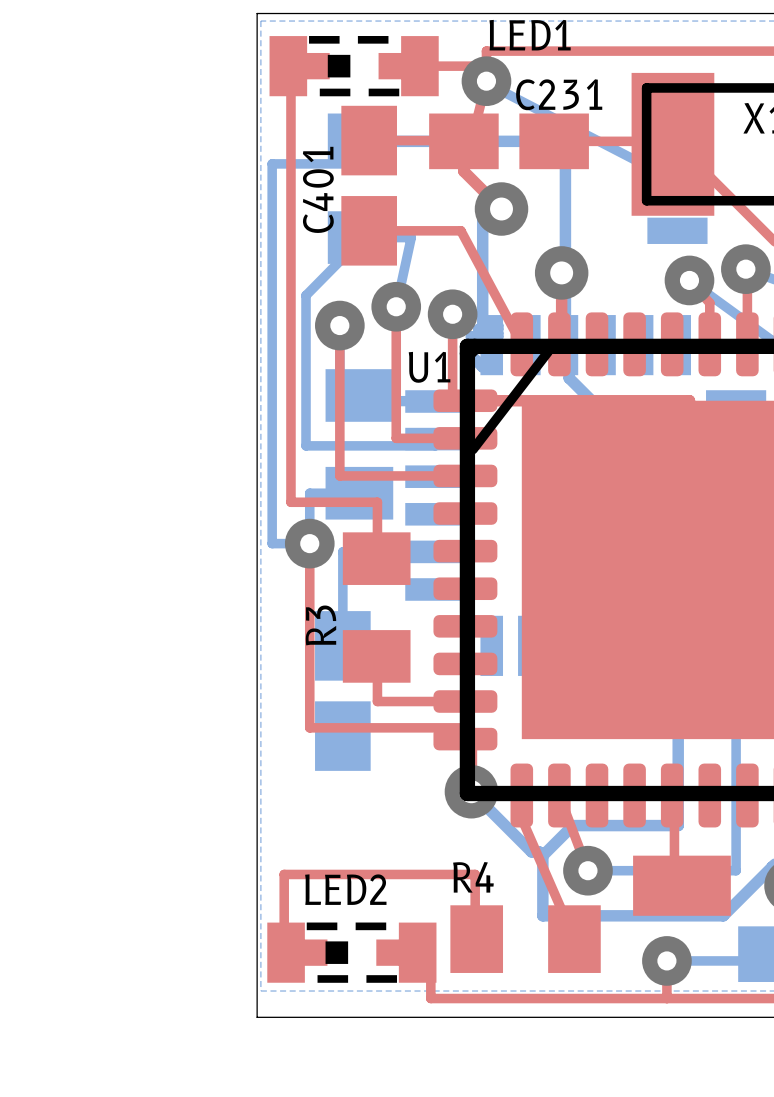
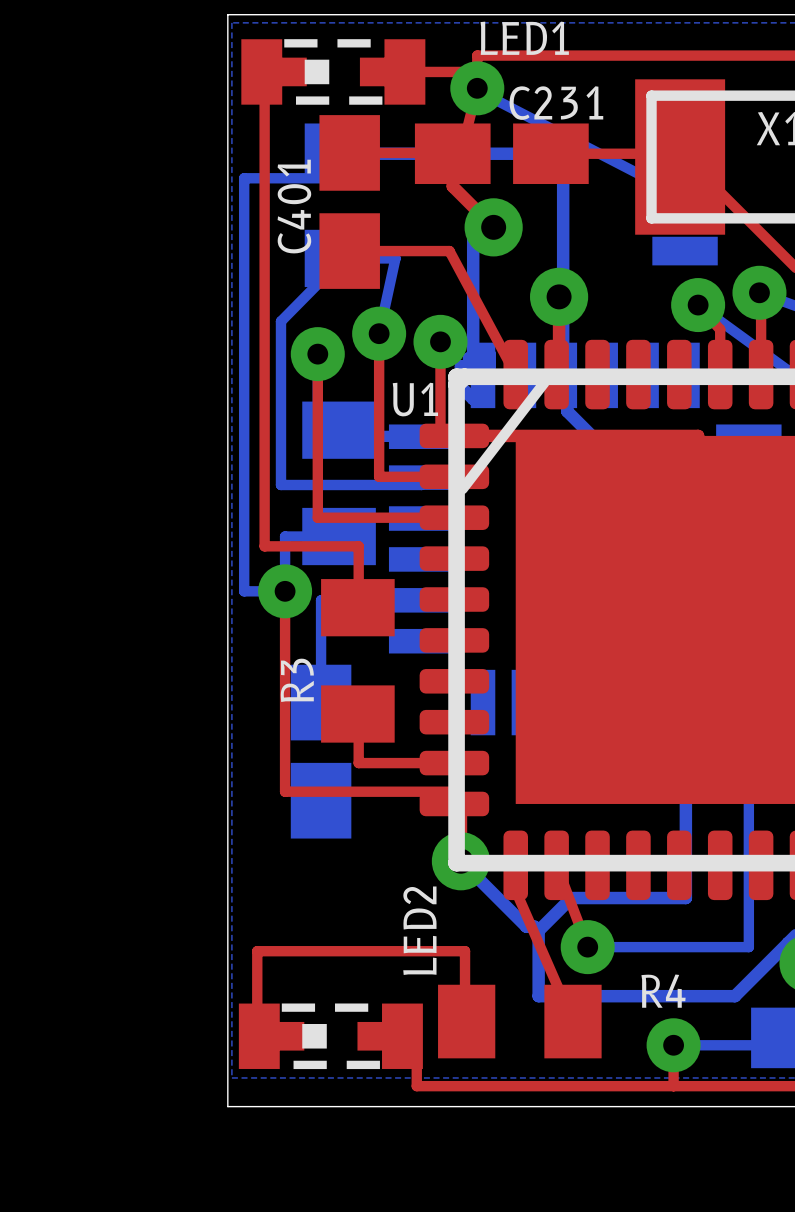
top track: (674, 825) (674, 855) -> none
drawing: [633, 855, 731, 916] -> none
R4 name position: R4 (473, 877) -> R4 (663, 991)
LED2 name rotation: 0° (345, 889) -> 90° counterclockwise (419, 930)

